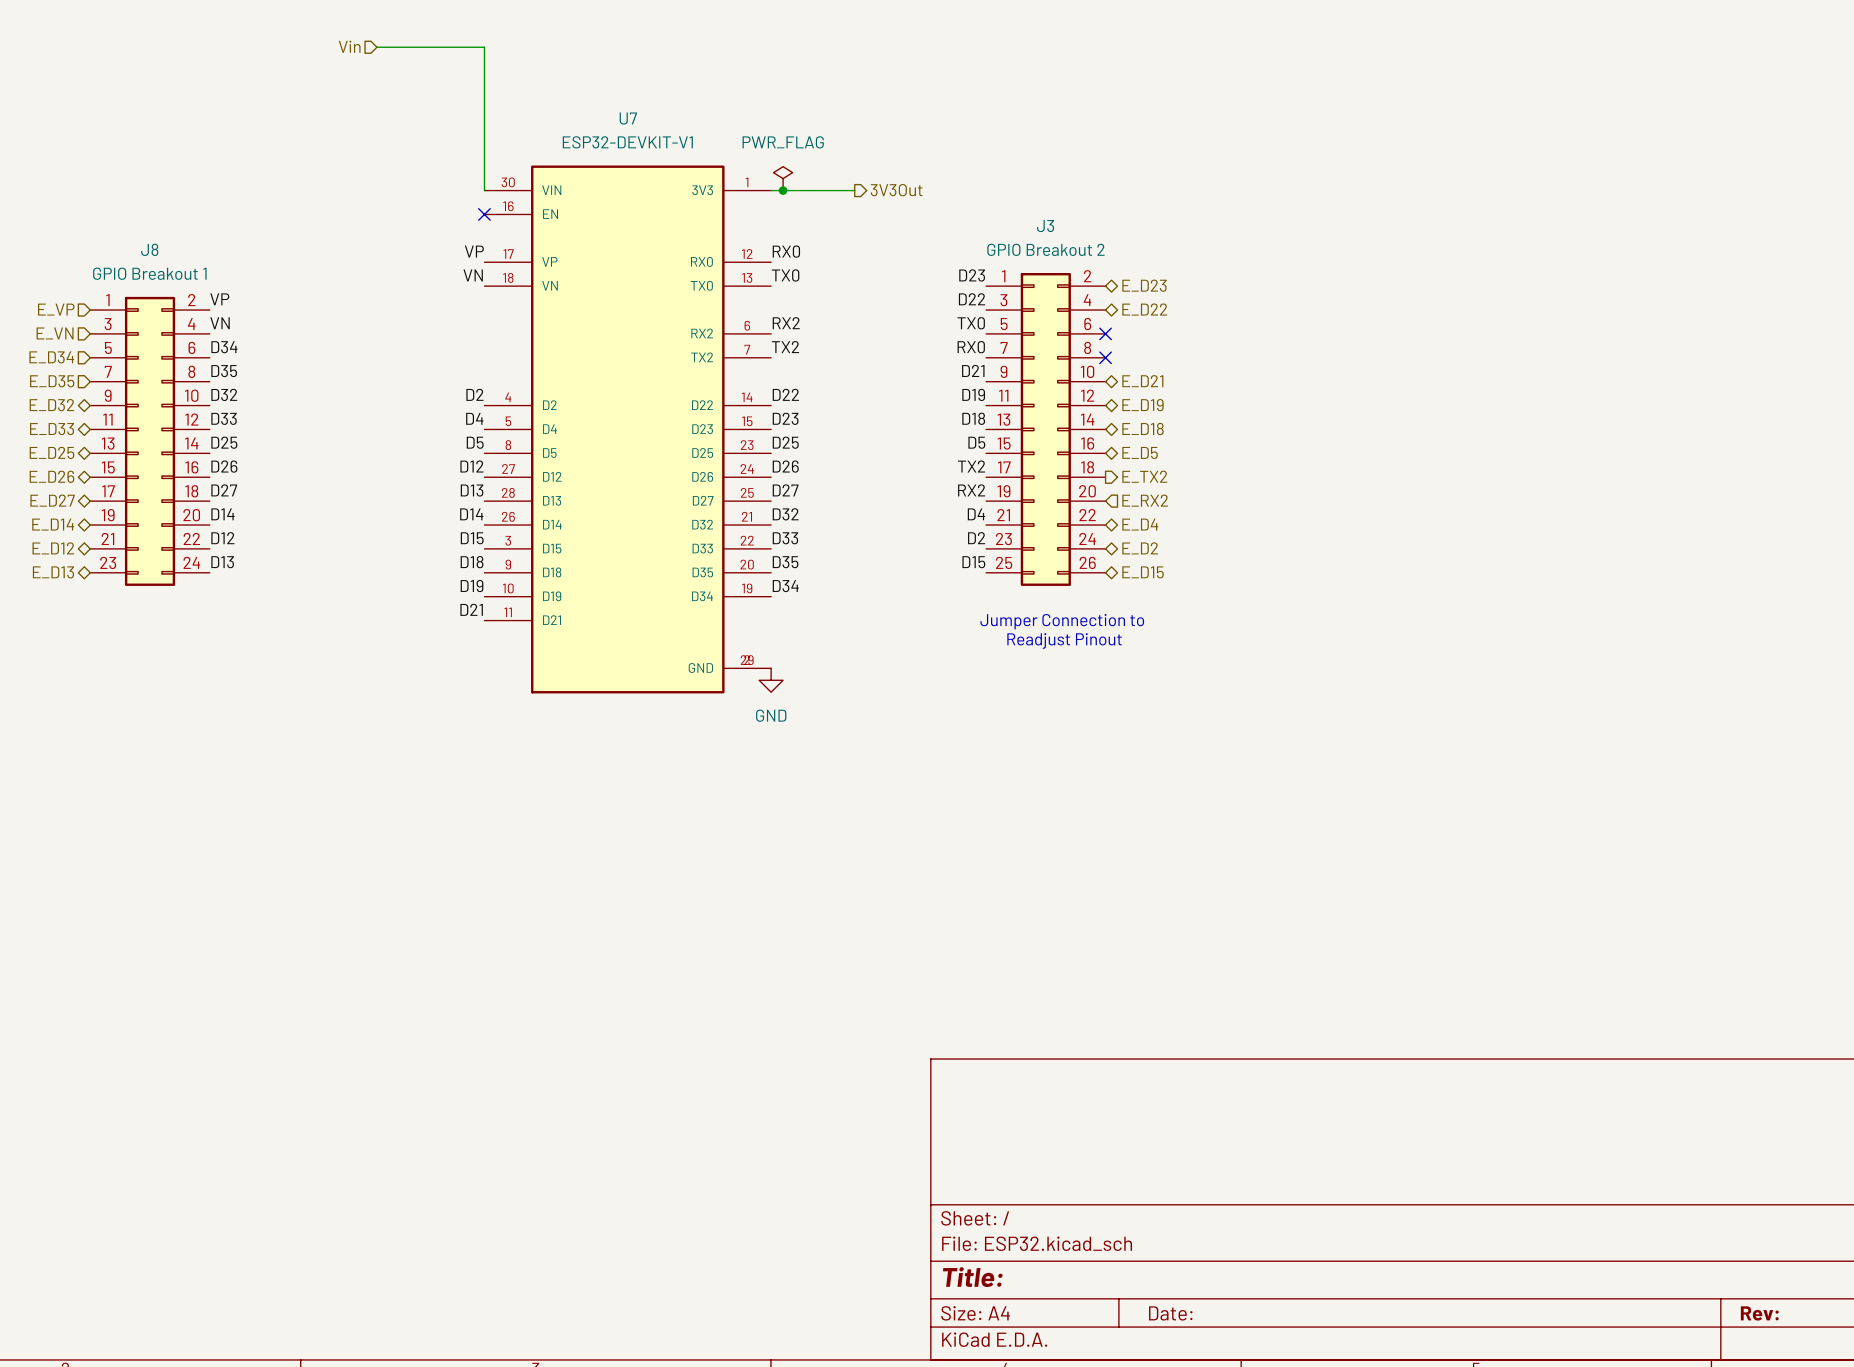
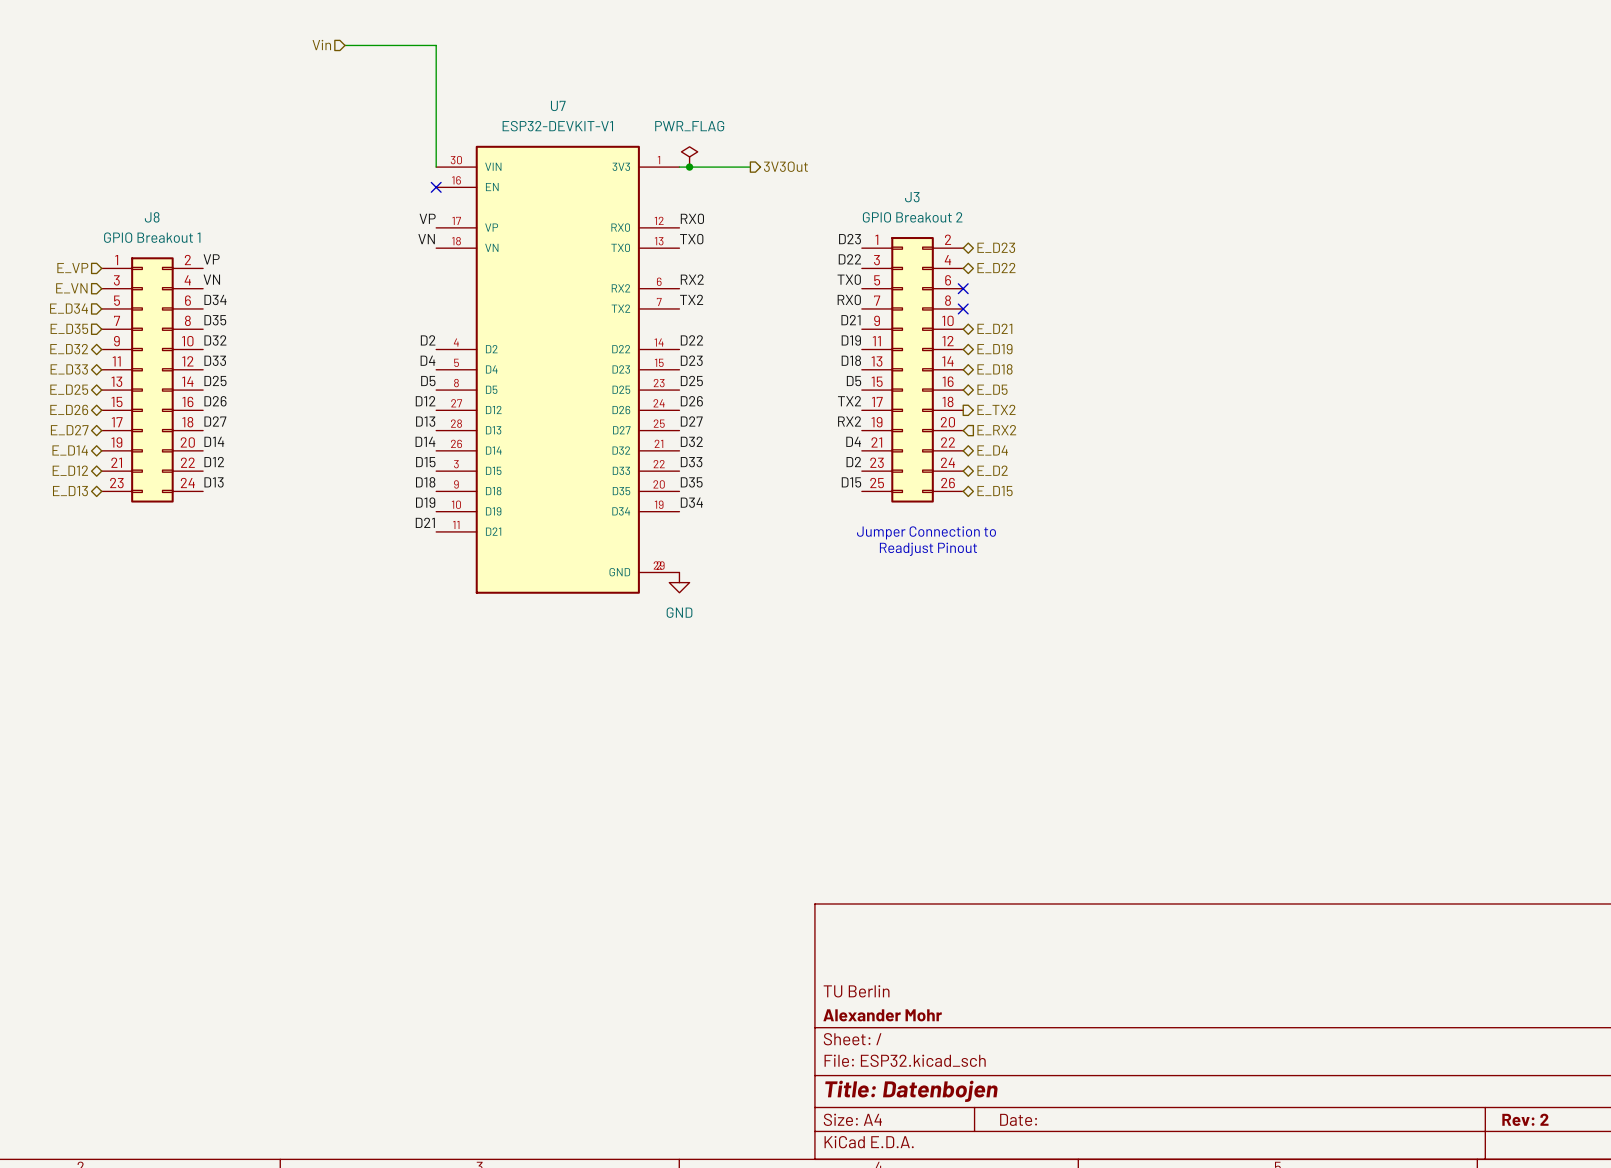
title block: none -> TU Berlin (856, 991)
title block: none -> Alexander Mohr (882, 1015)
title block: Title: (972, 1277) -> Title: Datenbojen (911, 1091)
title block: Rev: (1759, 1313) -> Rev: 2 (1525, 1119)

